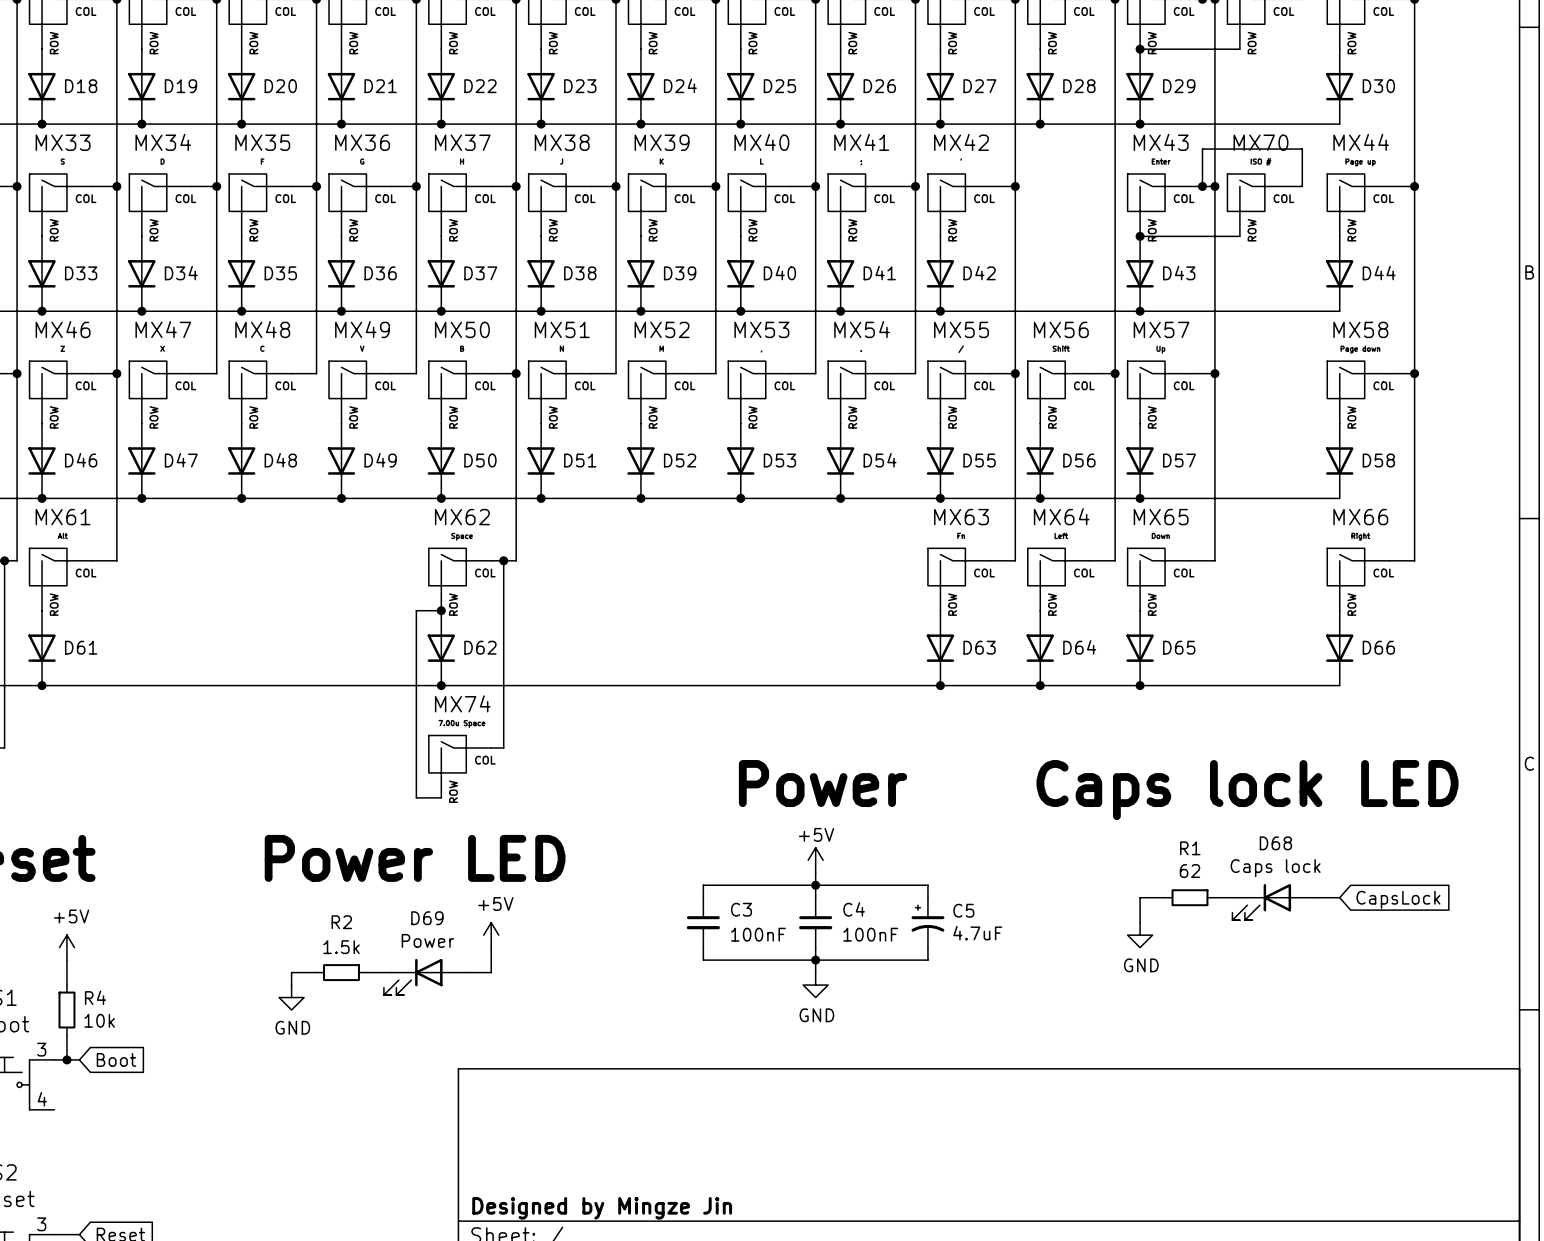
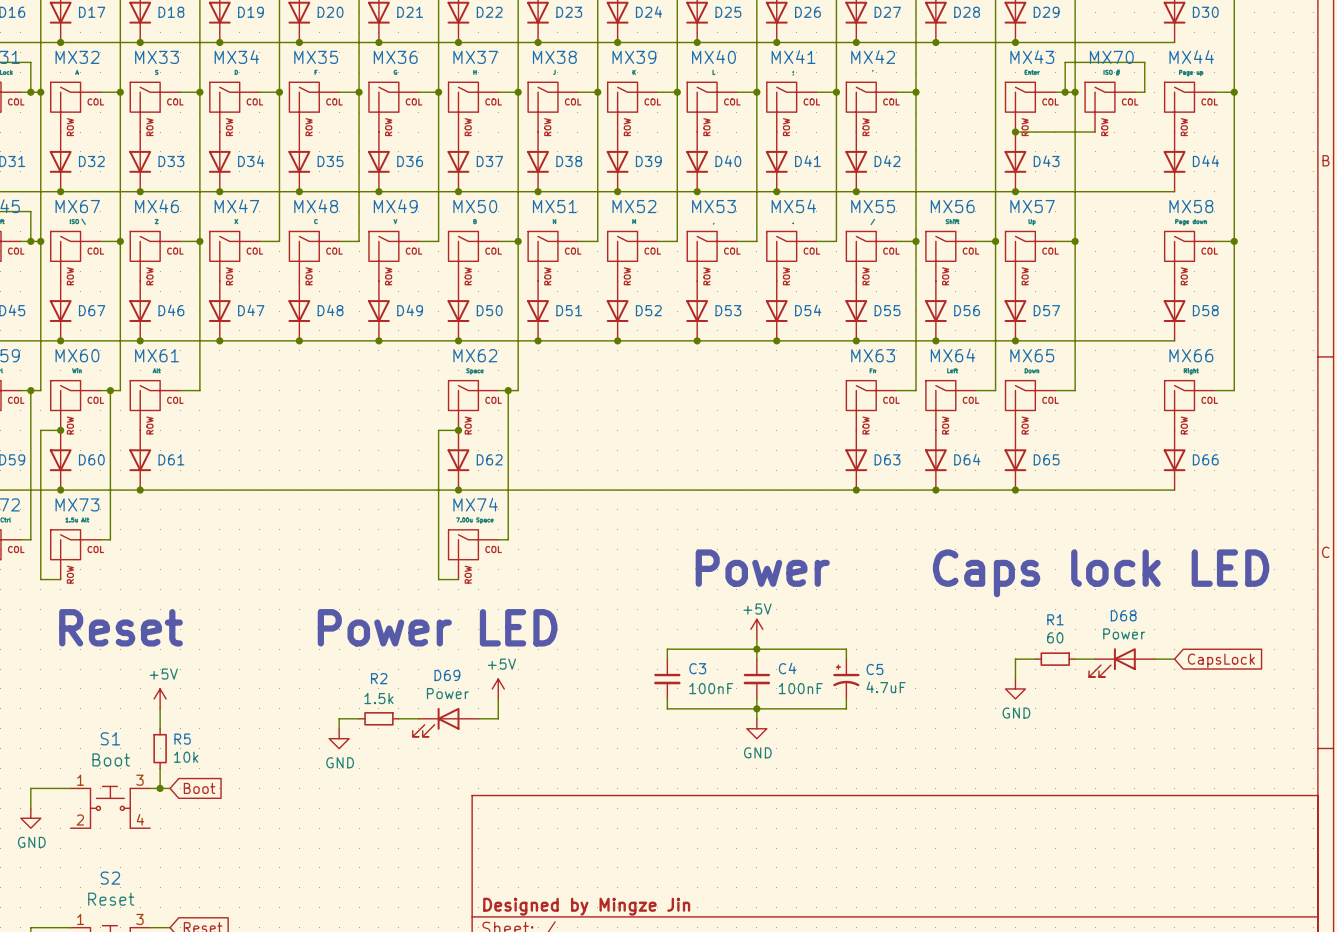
D68 value: Caps lock (1275, 868) -> Power (1124, 633)
R1 value: 62 (1190, 871) -> 60 (1055, 637)
R4 name: R4 (95, 997) -> R5 (182, 739)

